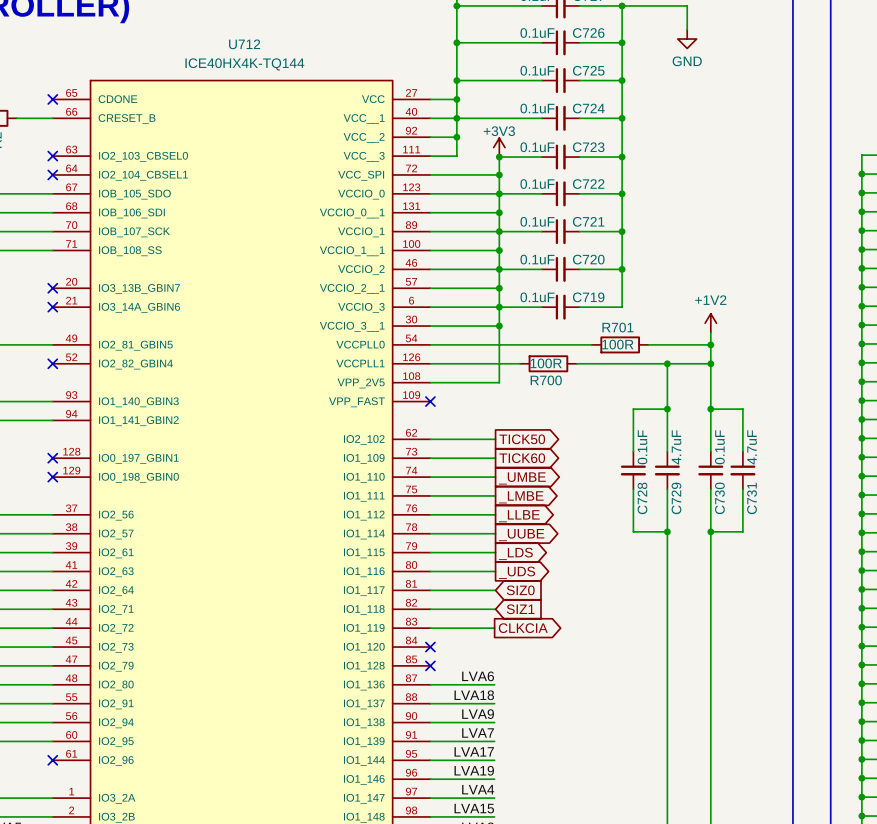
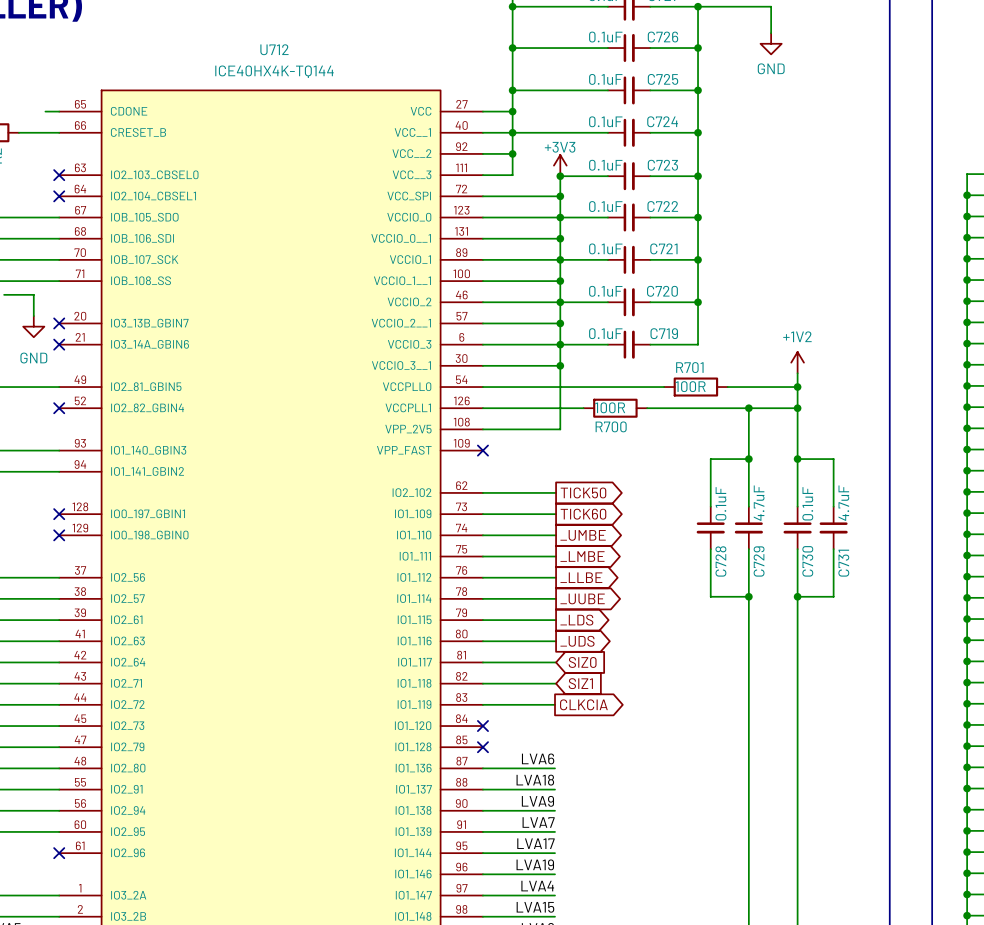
wire: none -> (45, 111) (59, 111)
no-connect mark: (52, 99) -> none
wire: none -> (4, 294) (33, 294) (33, 316)
power symbol: none -> GND (33, 326)

